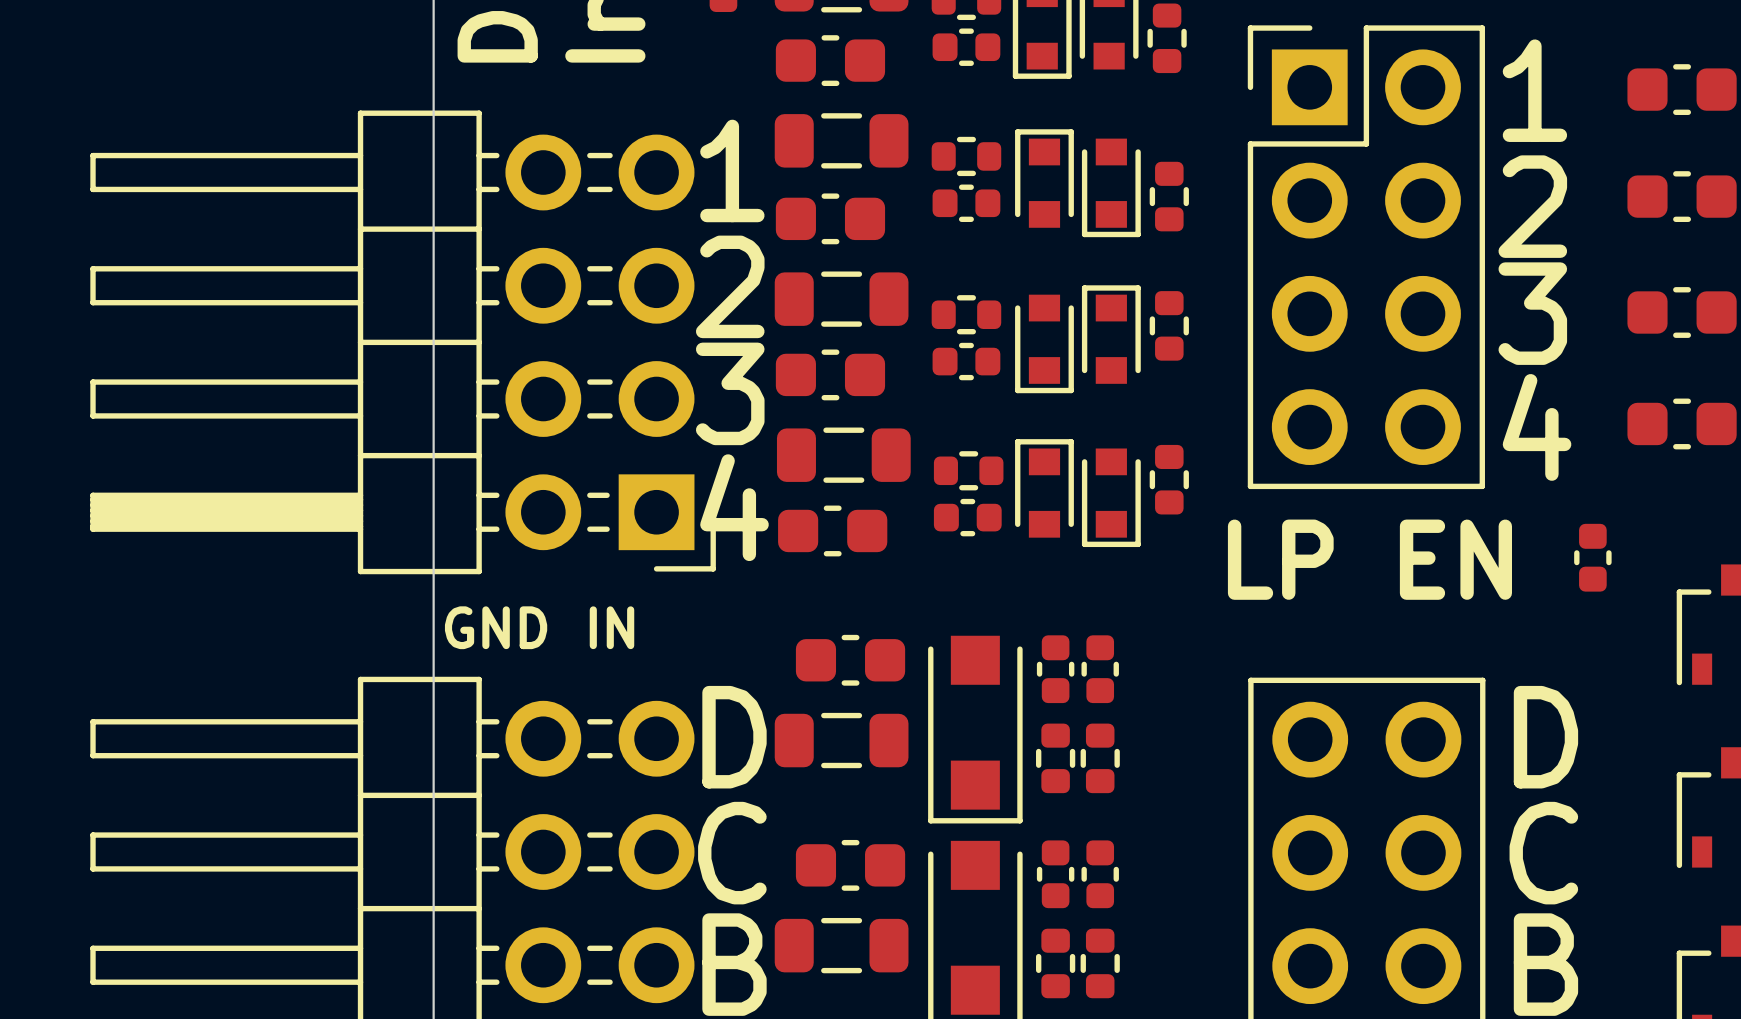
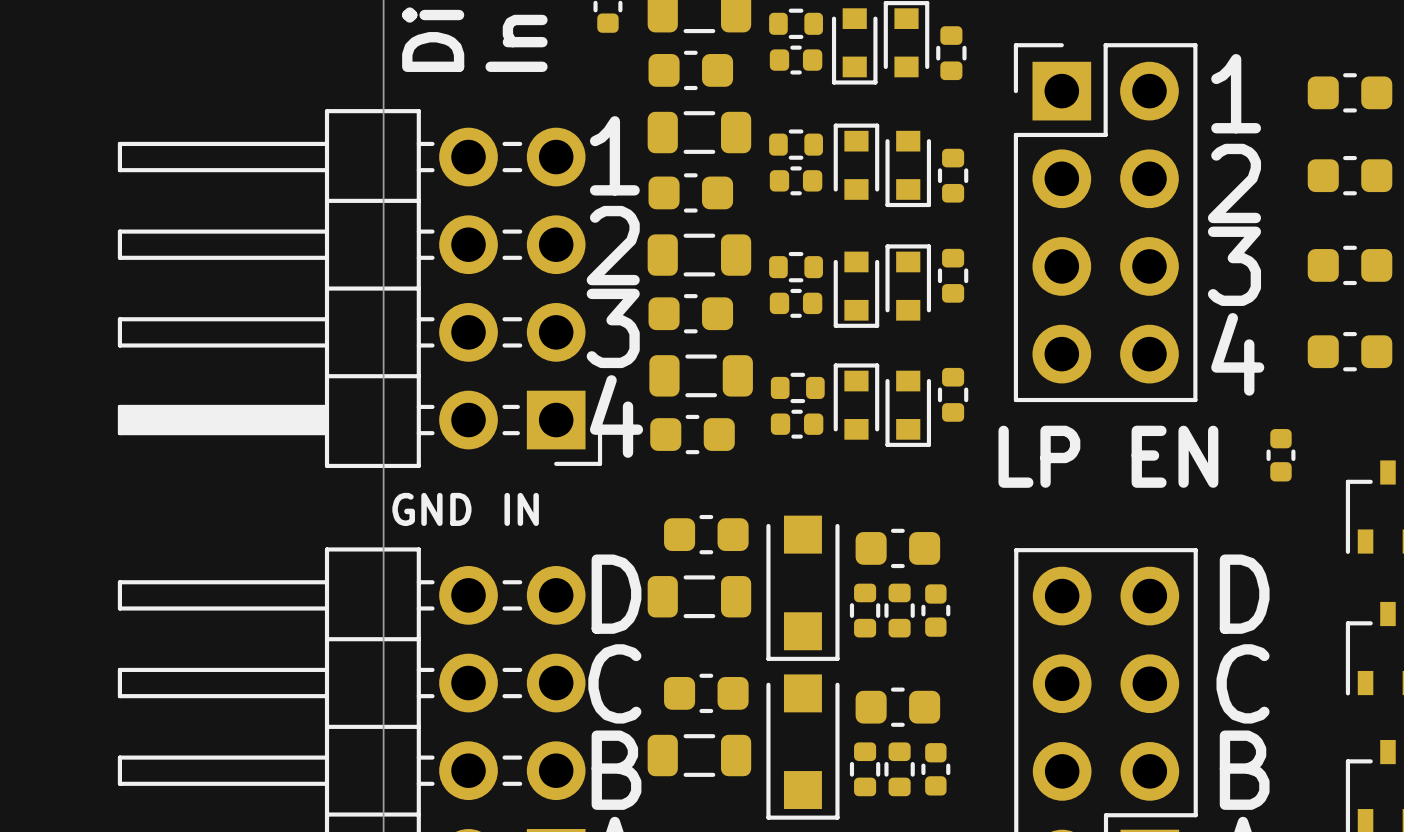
part footprint: [1081, 635, 1119, 704] -> [855, 528, 941, 569]
part: (1055, 669) -> none
part: none -> (935, 610)
part footprint: [1081, 840, 1119, 909] -> [855, 687, 941, 727]
part: (1055, 874) -> none
part: none -> (935, 769)

